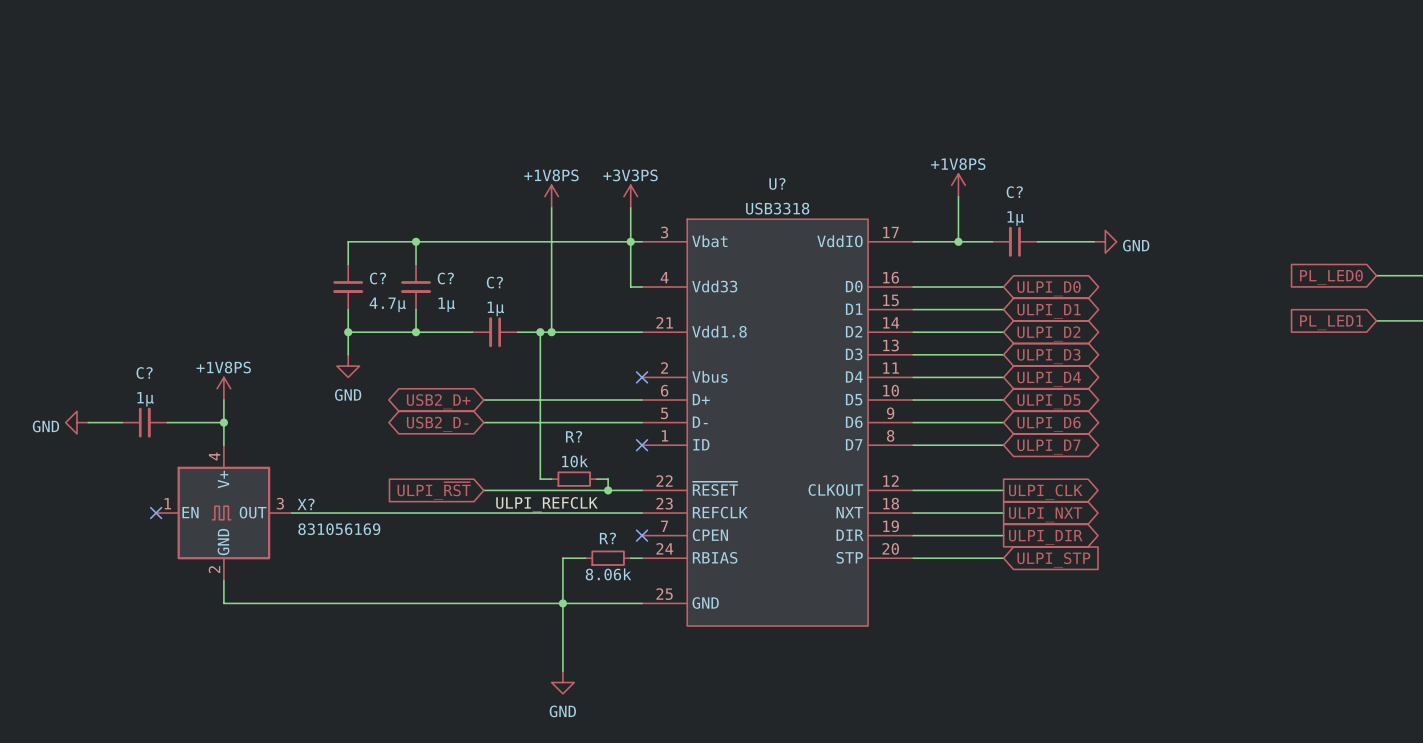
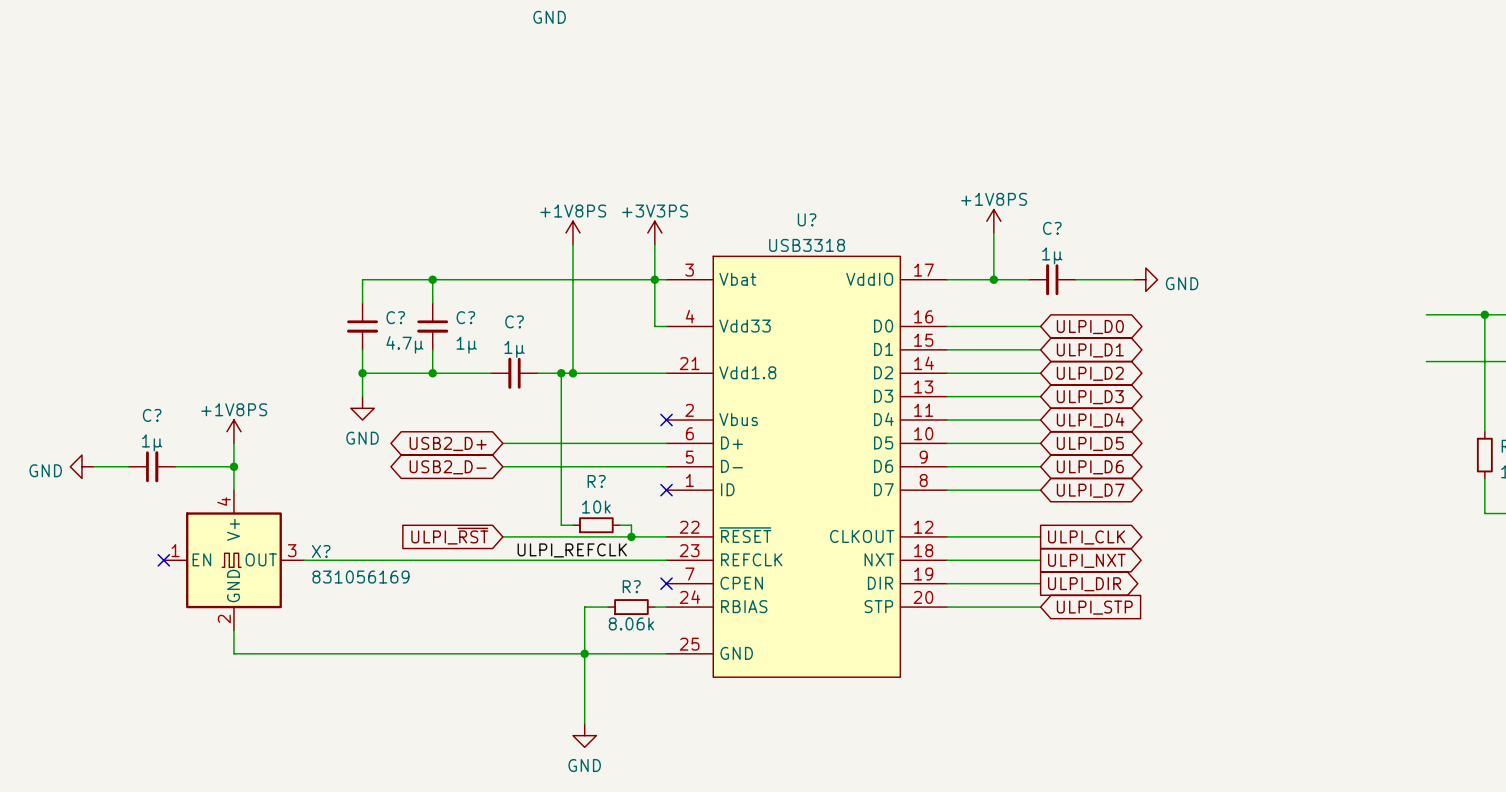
global label: PL_LED0 (1331, 277) -> none
global label: PL_LED1 (1331, 322) -> none

